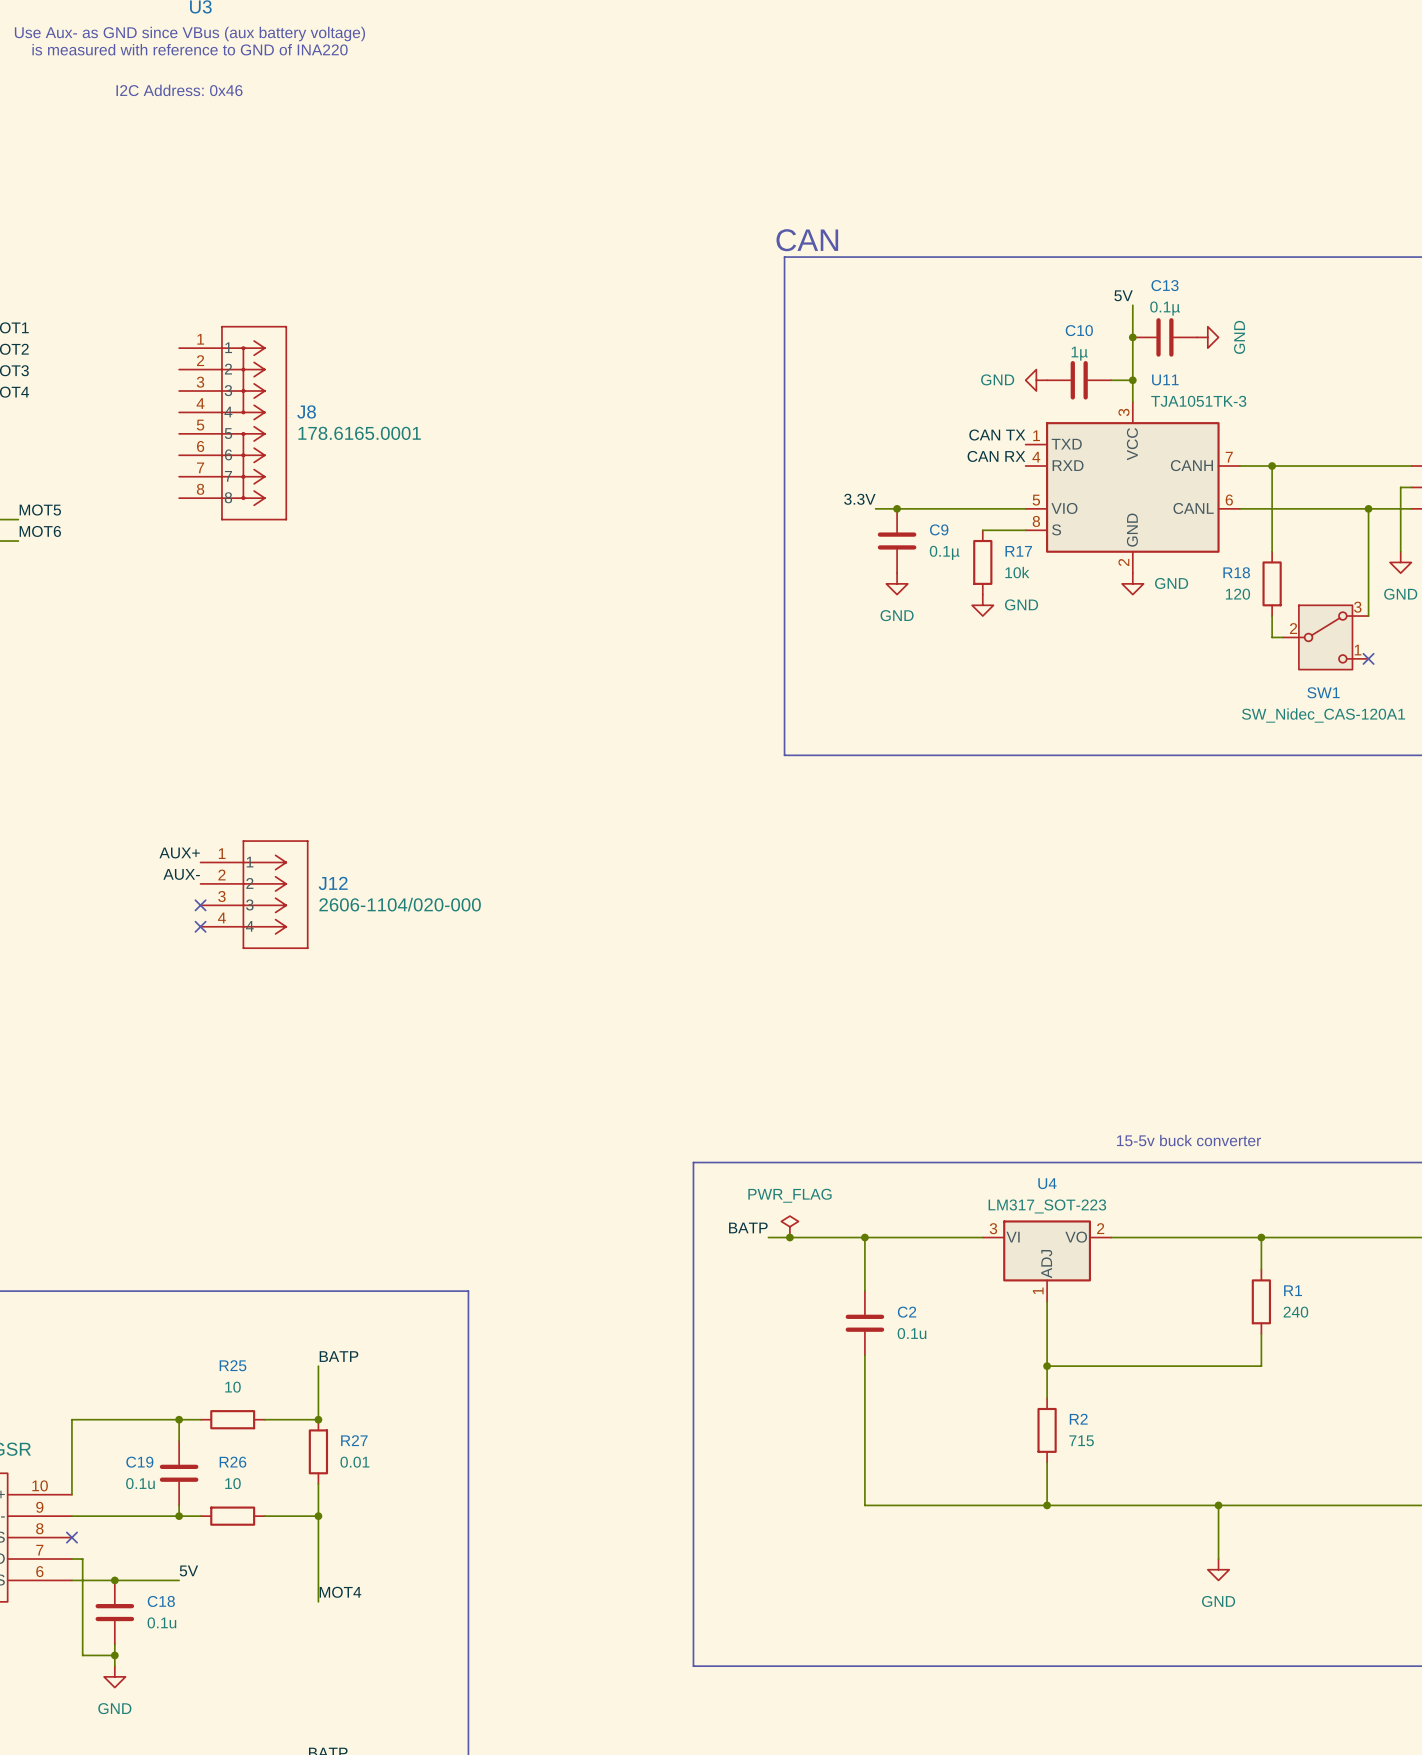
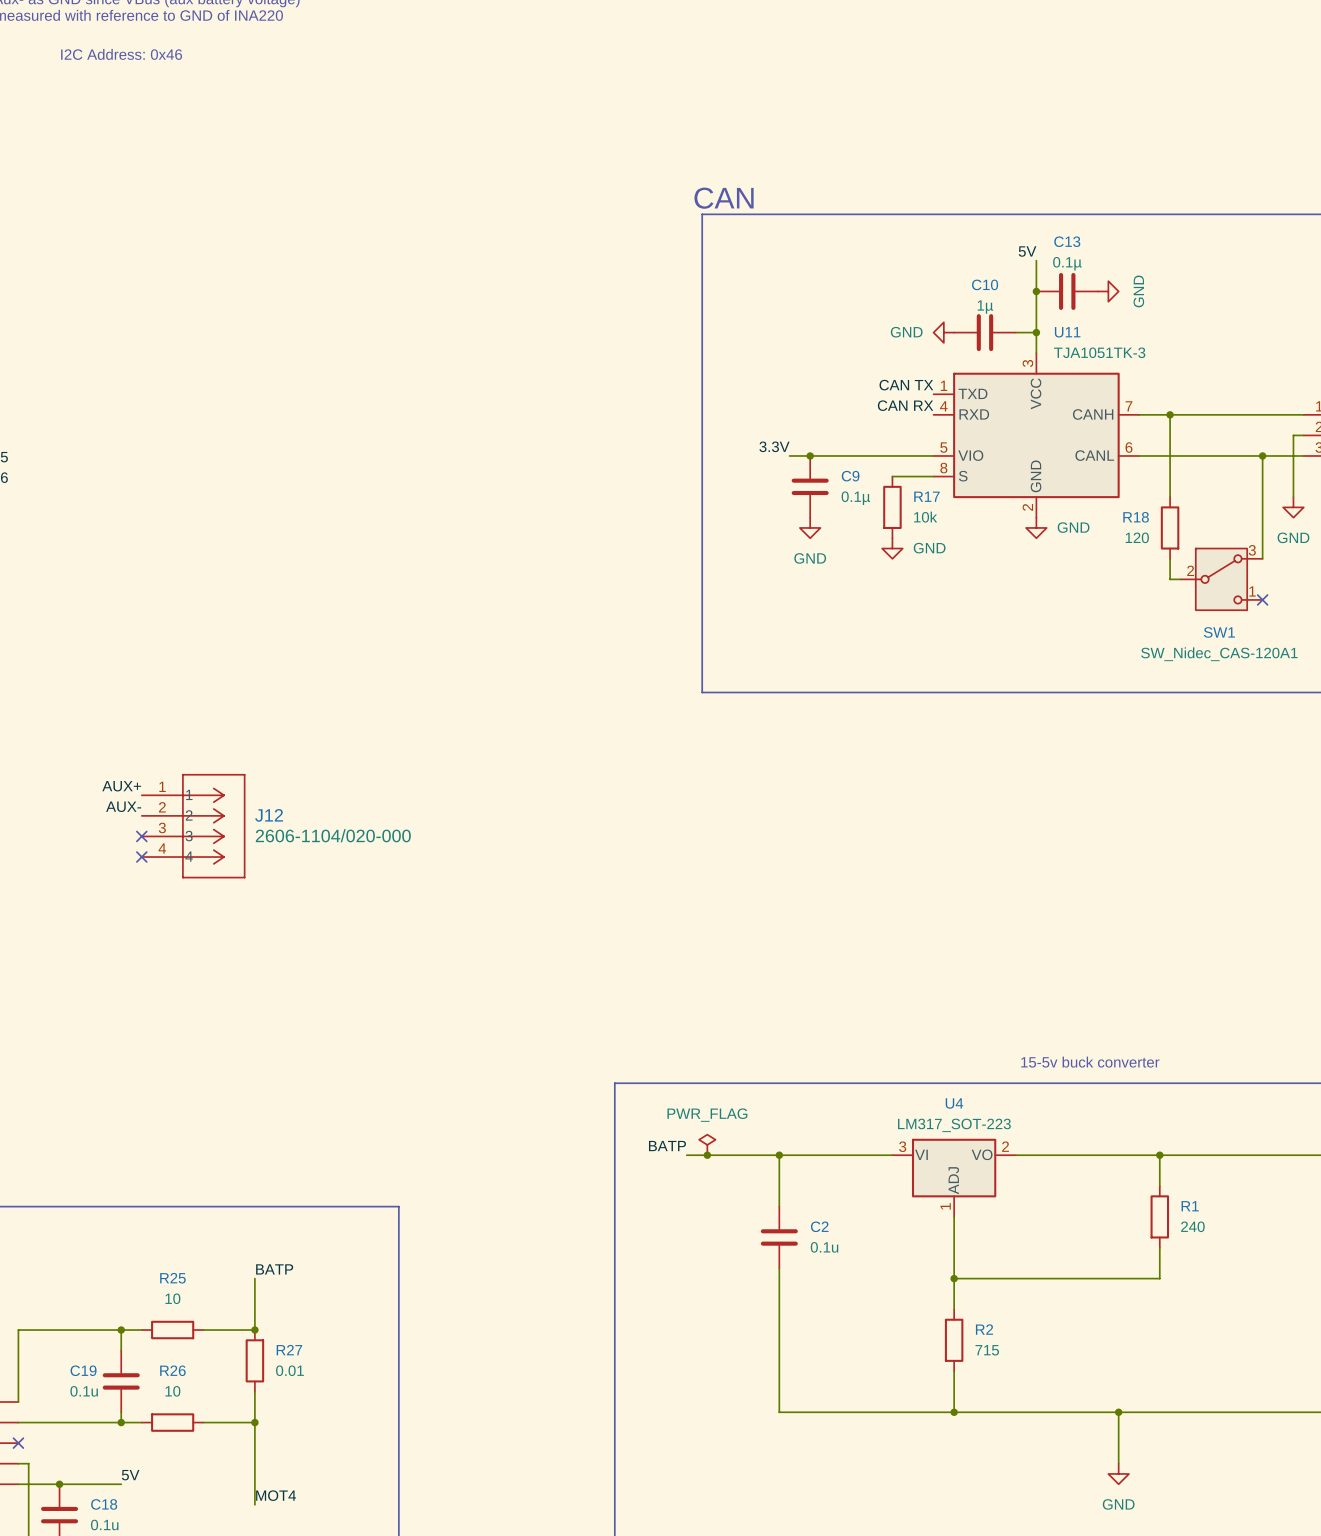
J8: 178.6165.0001 (232, 423) -> none

